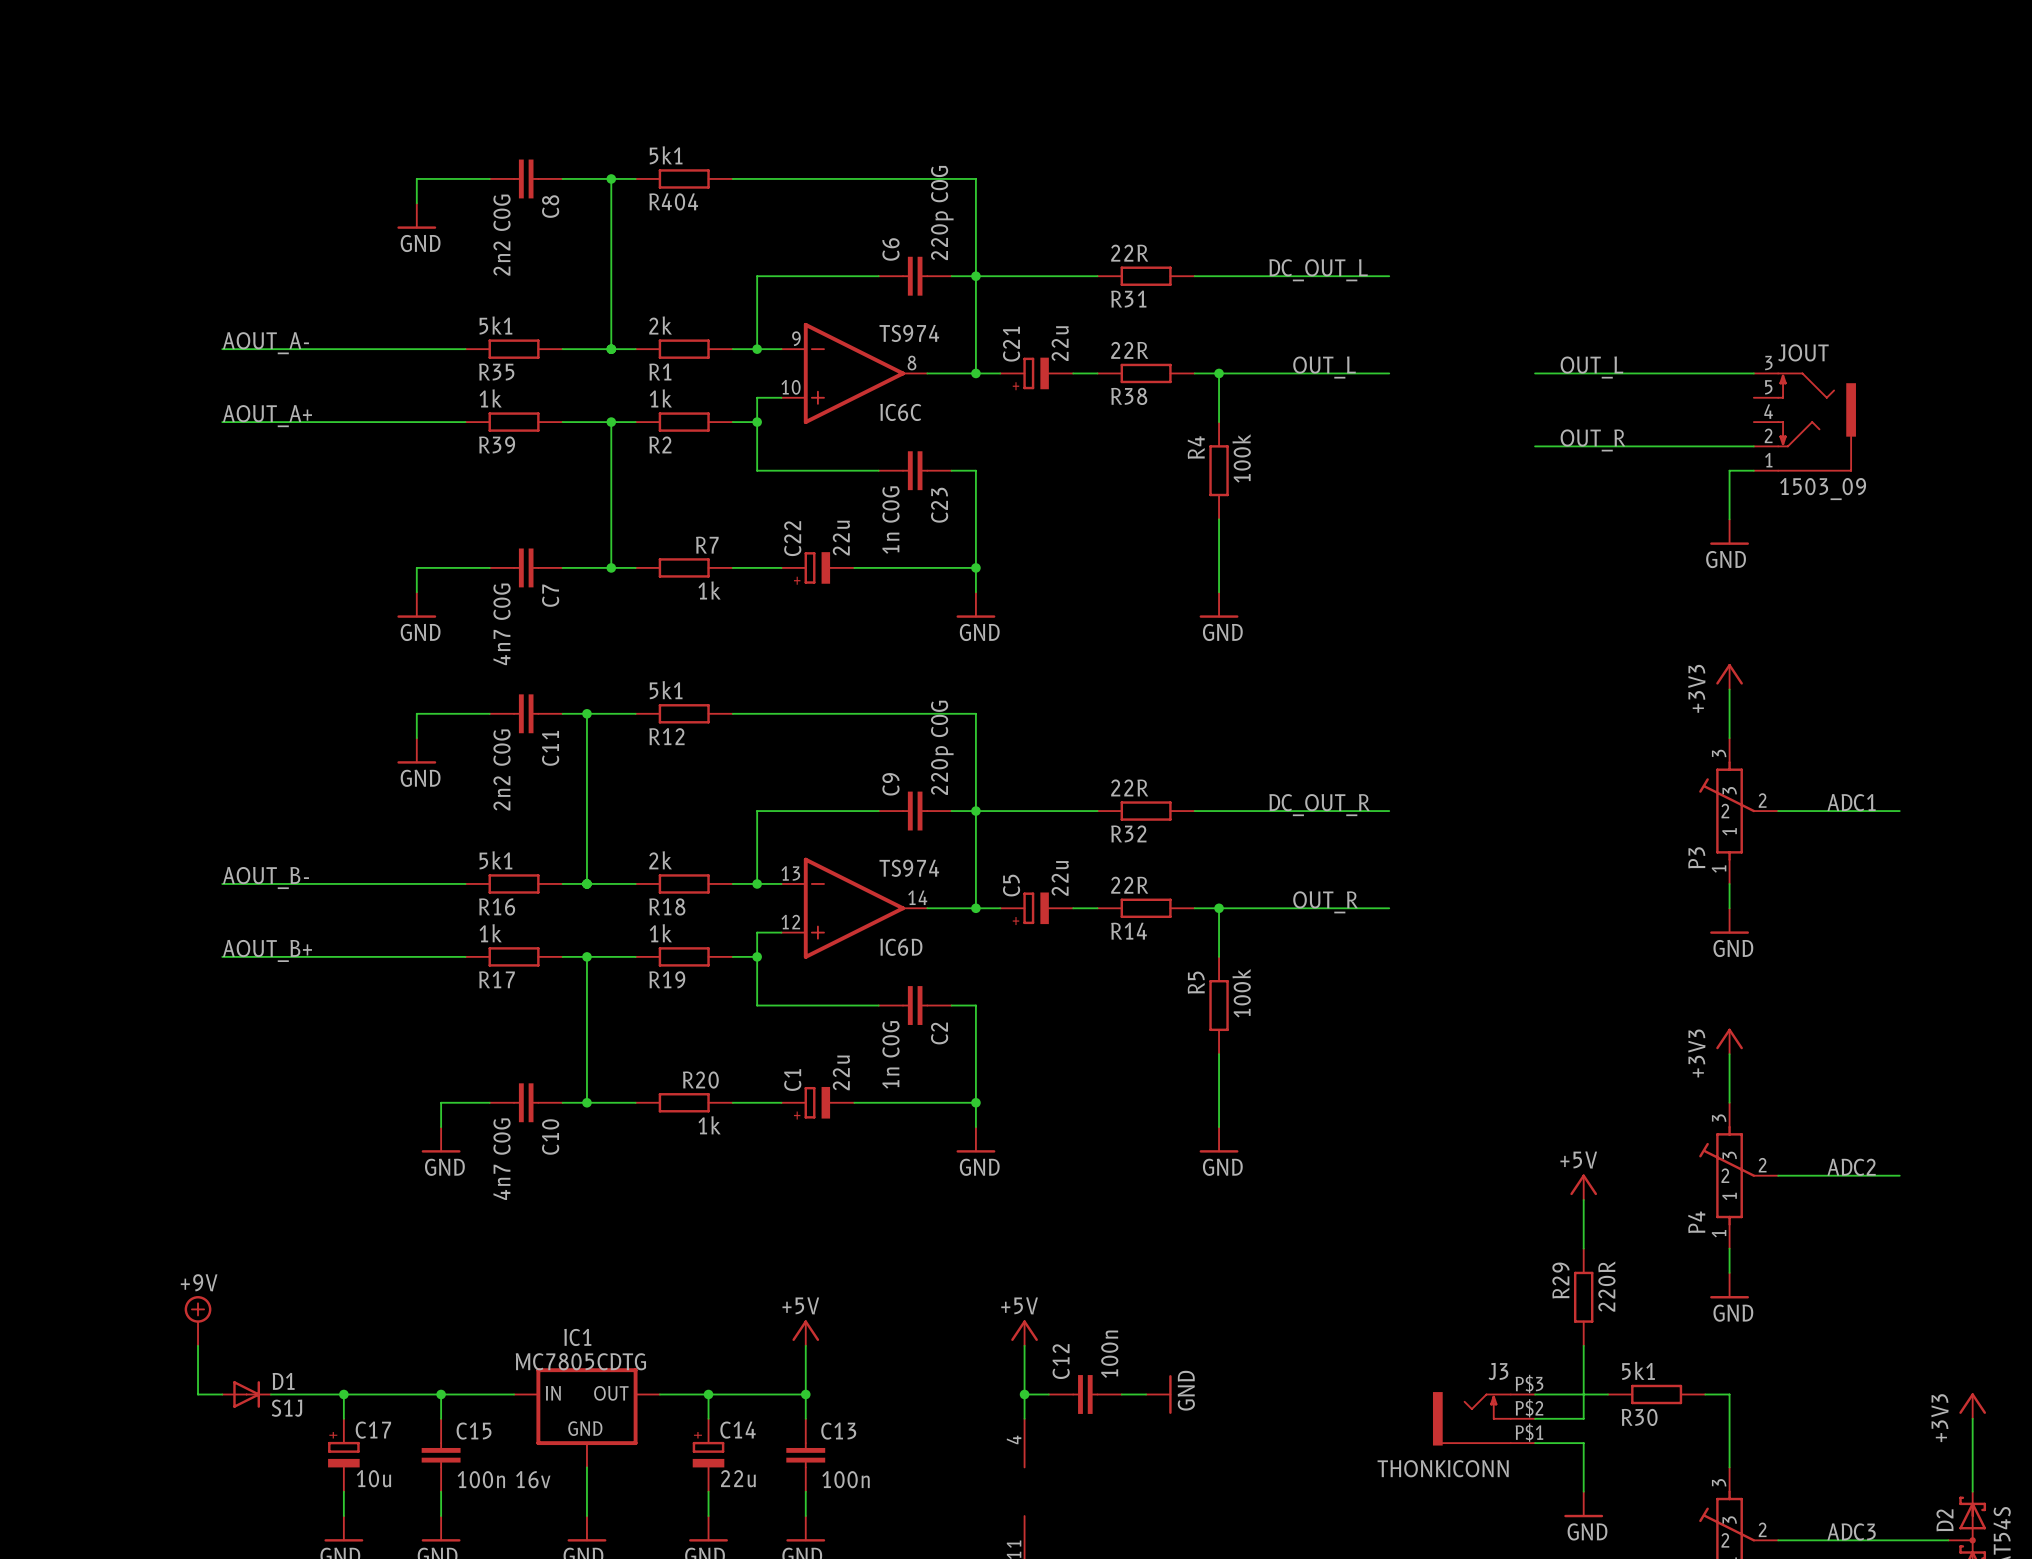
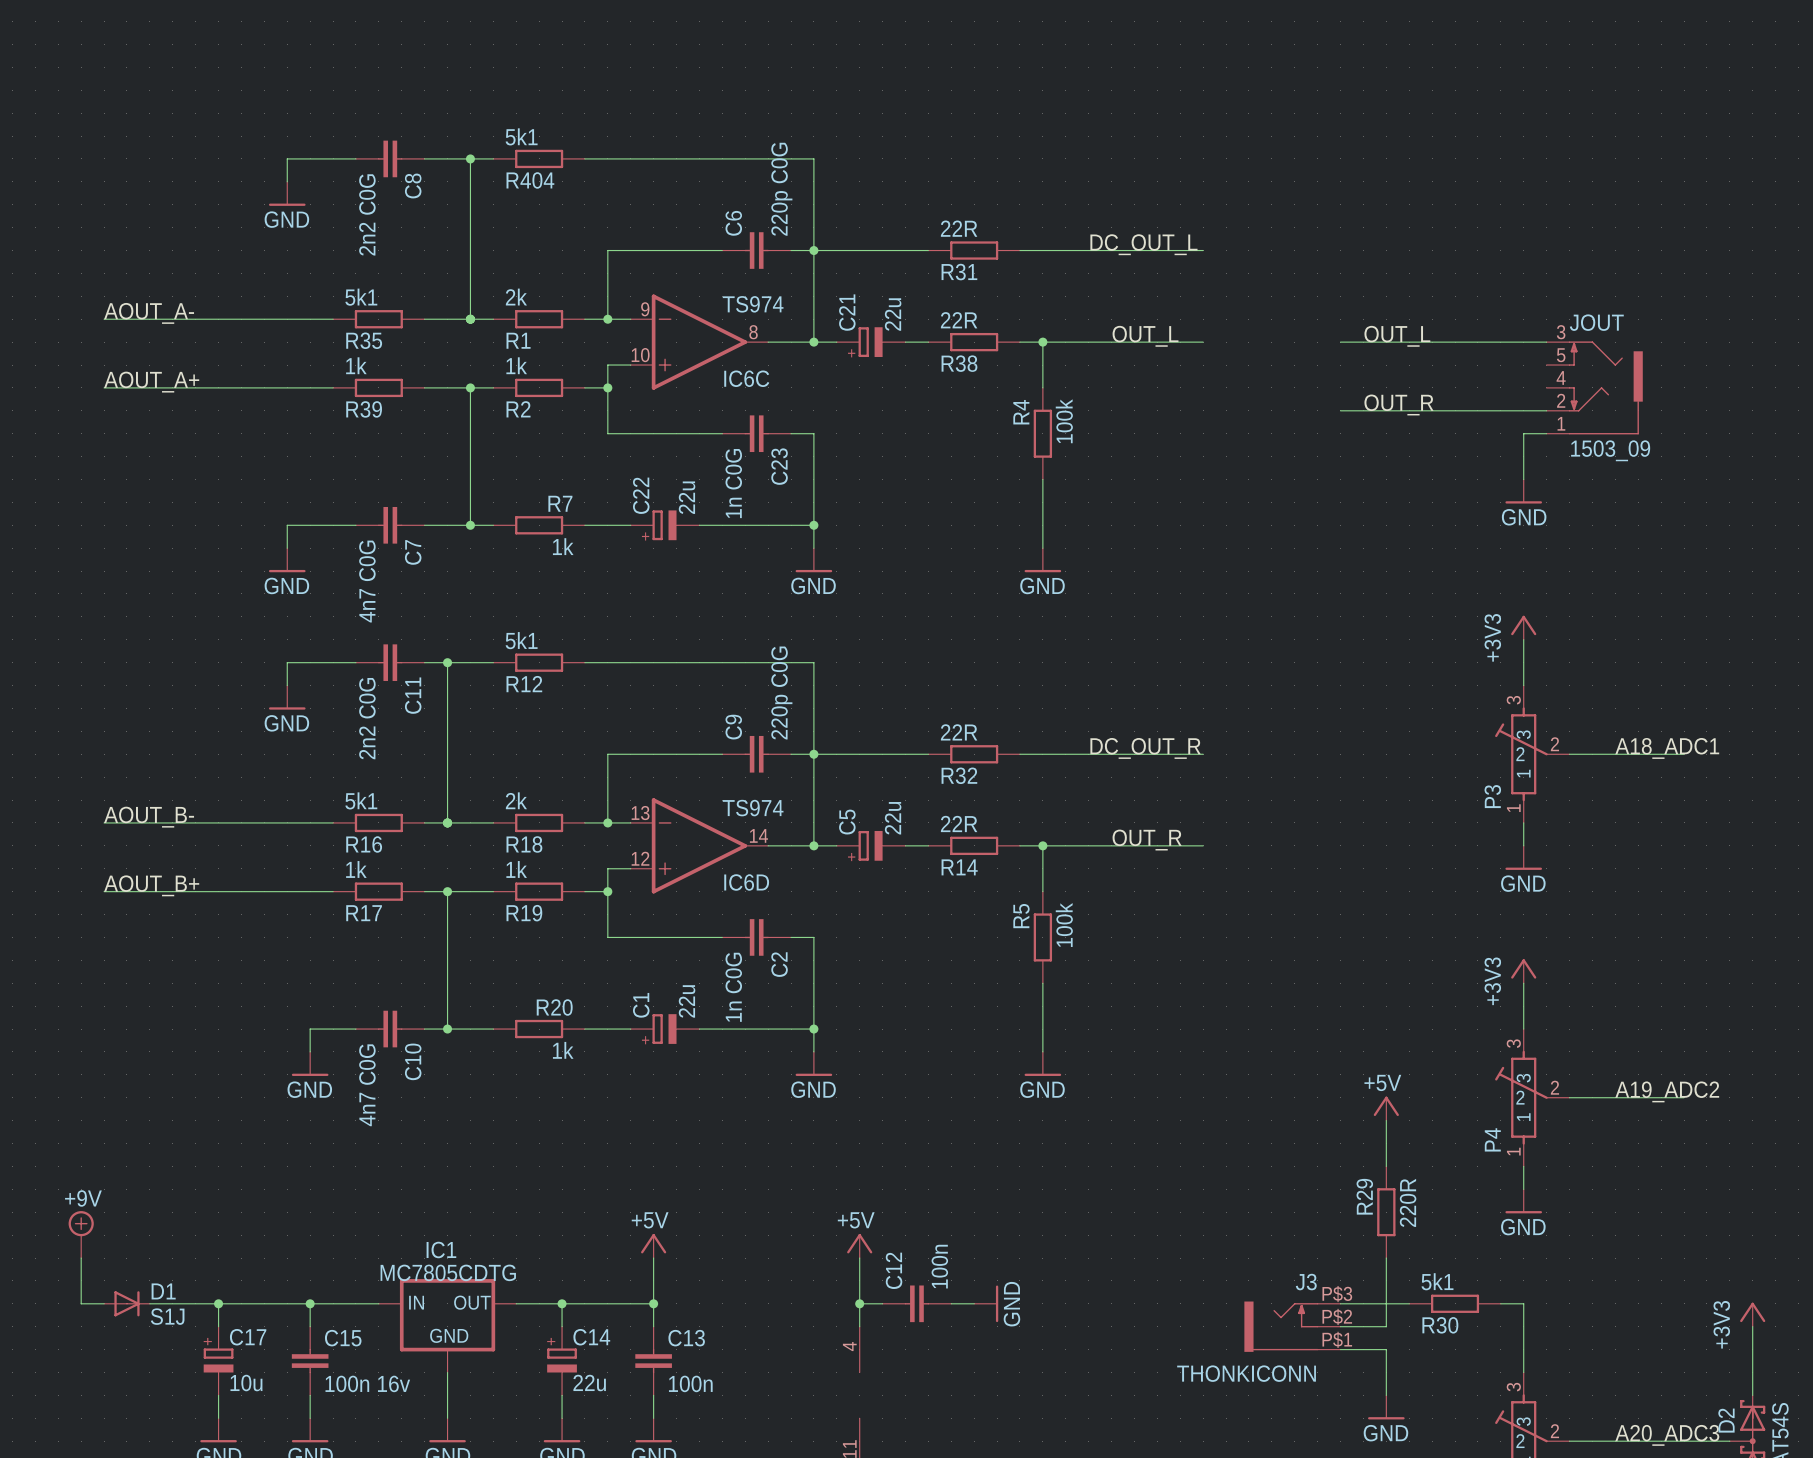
label: ADC1 (1851, 802) -> A18_ADC1 (1667, 748)
label: ADC2 (1851, 1167) -> A19_ADC2 (1667, 1091)
label: ADC3 (1851, 1531) -> A20_ADC3 (1667, 1435)

